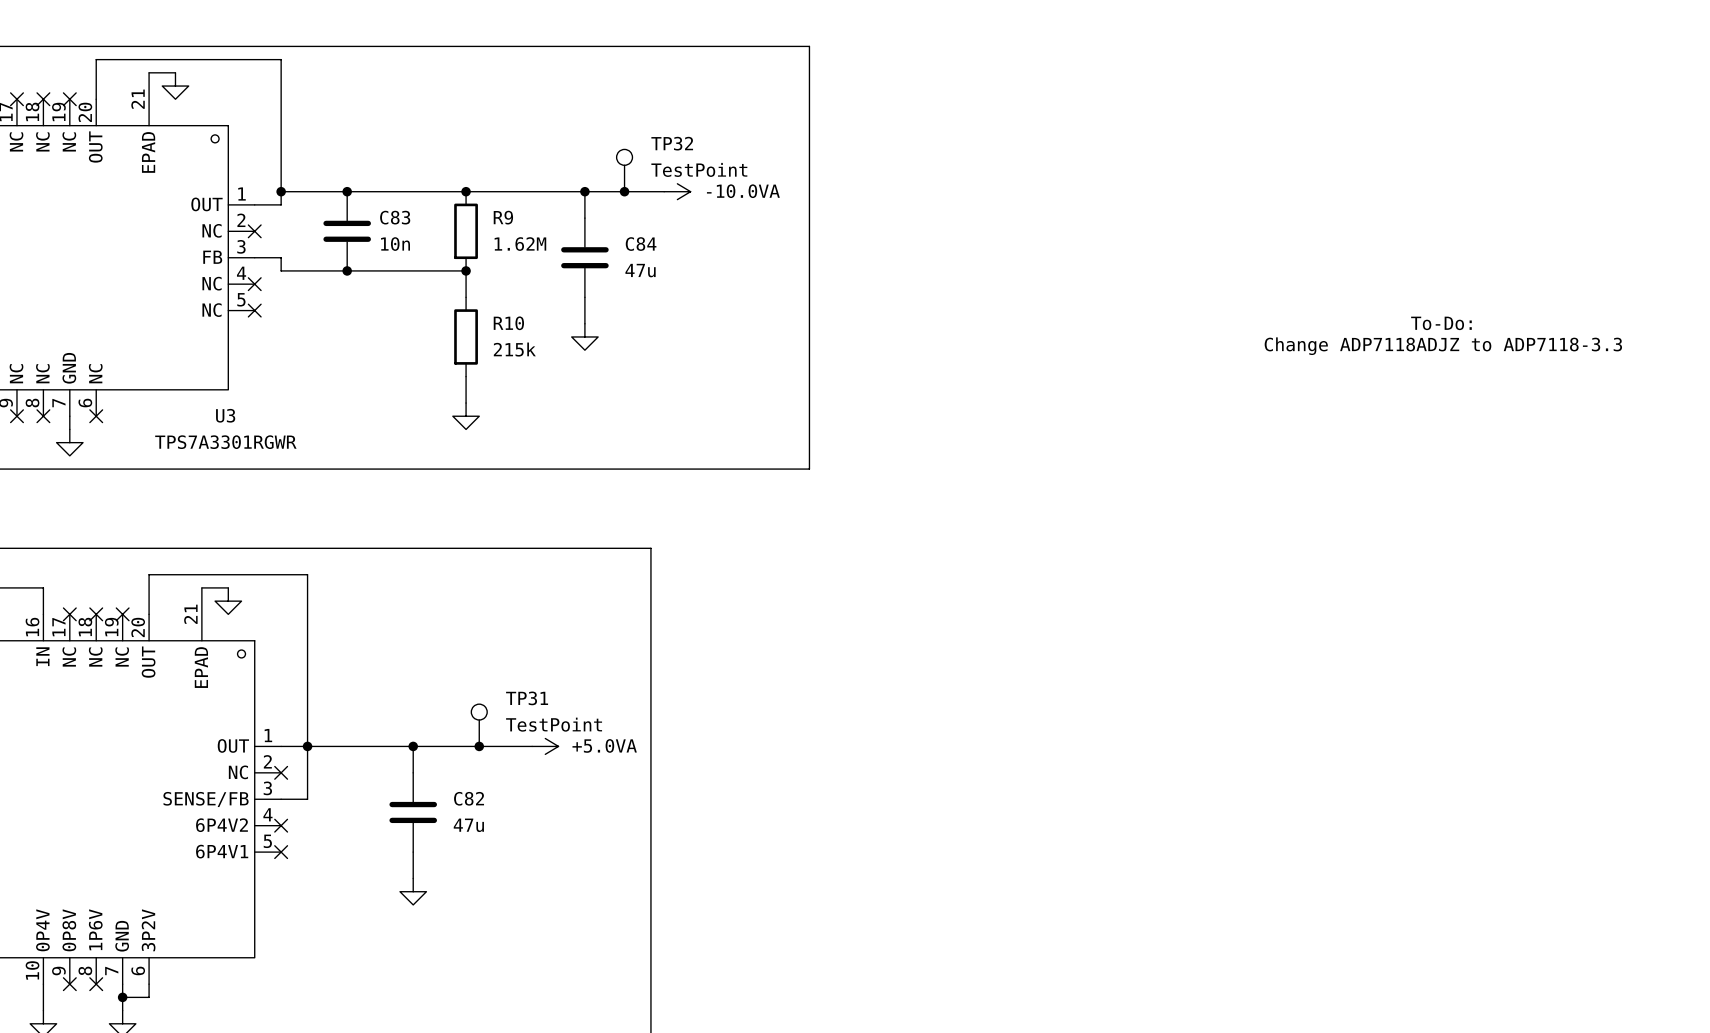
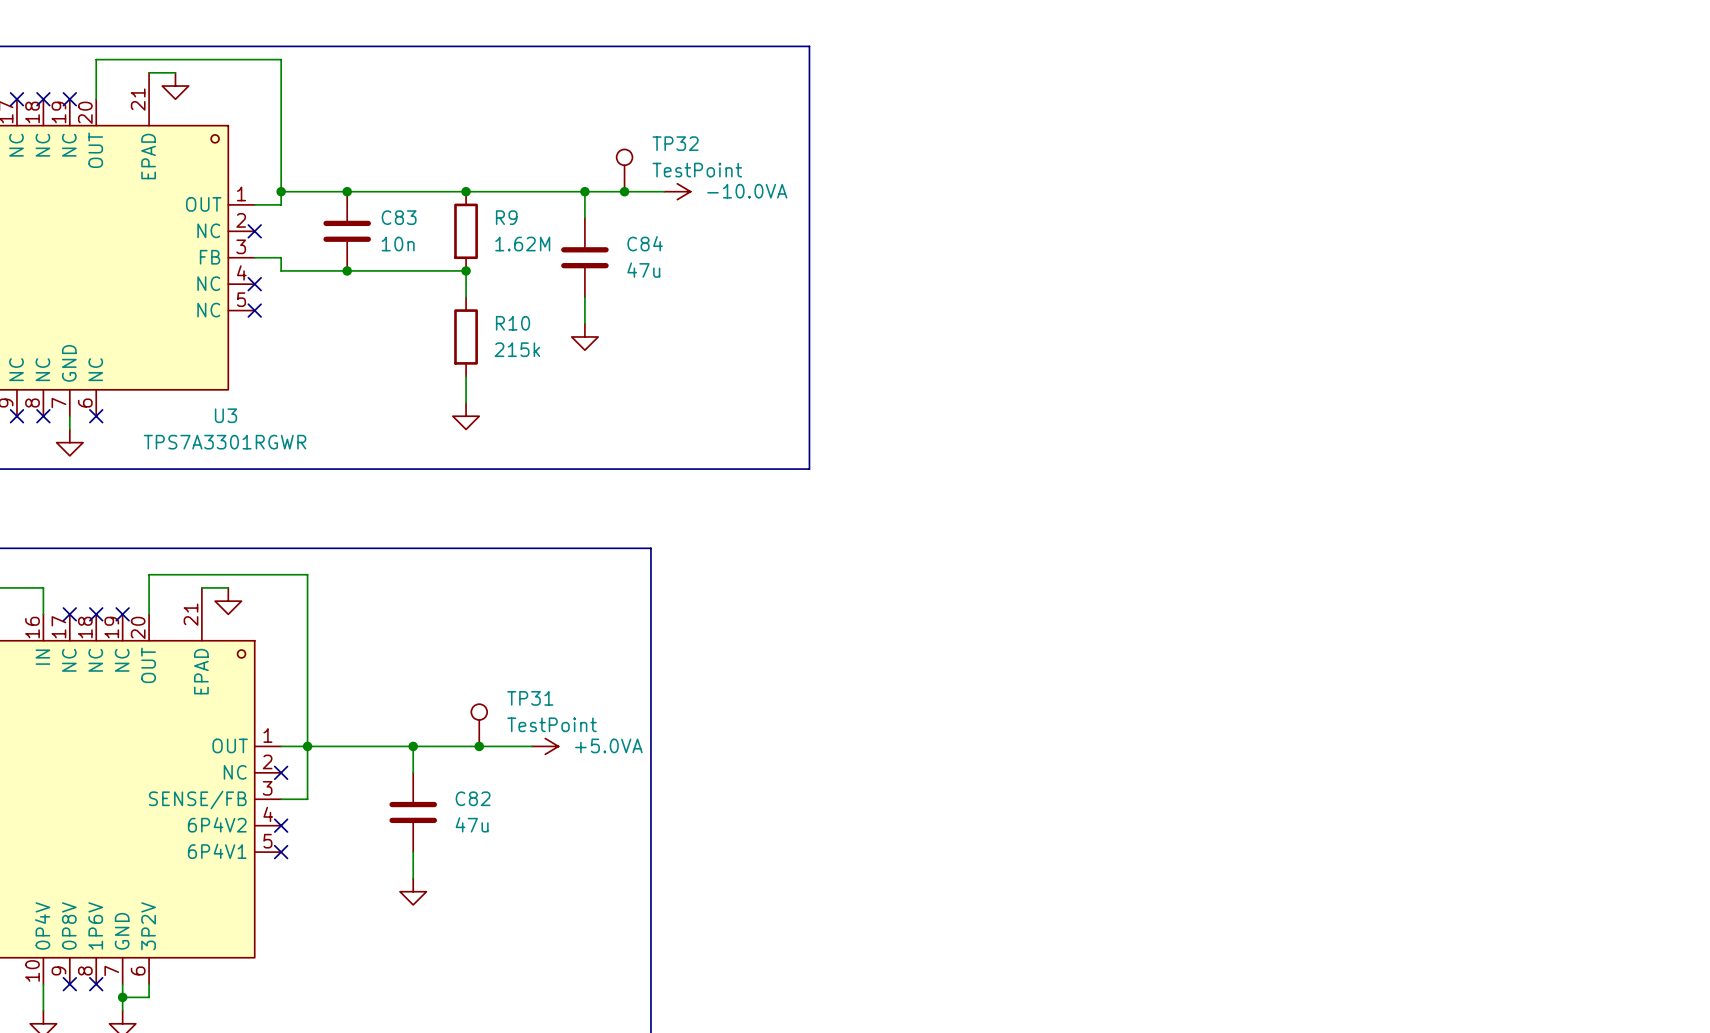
text: To-Do: (1441, 323) -> none
text: Change ADP7118ADJZ to ADP7118-3.3 (1443, 346) -> none

